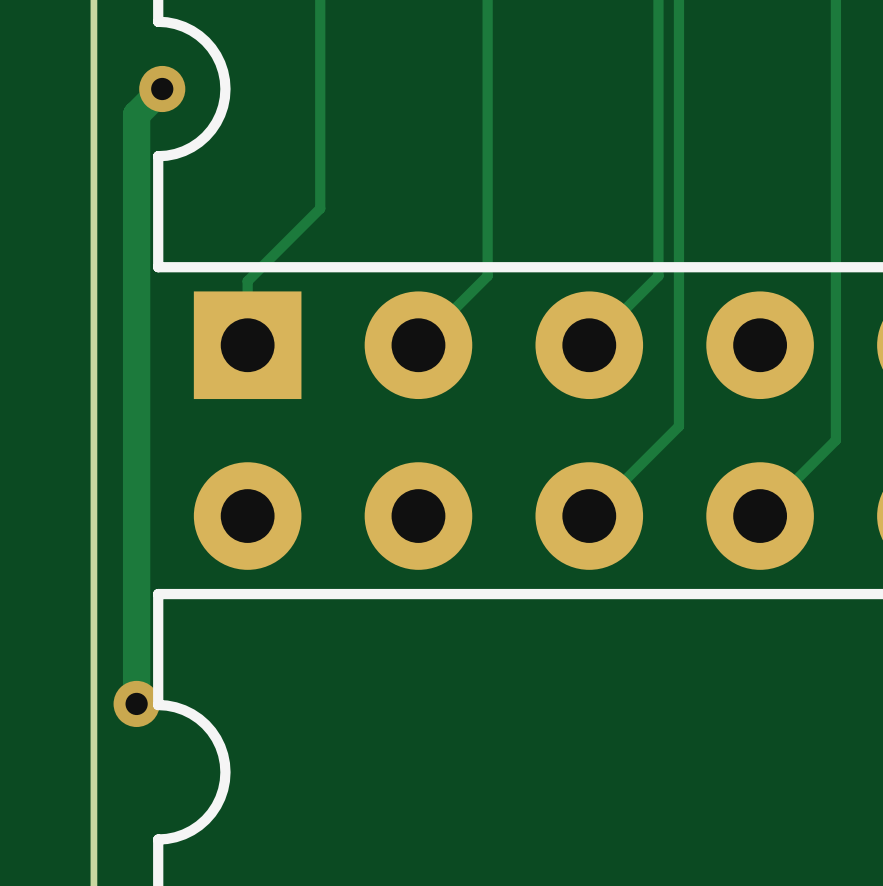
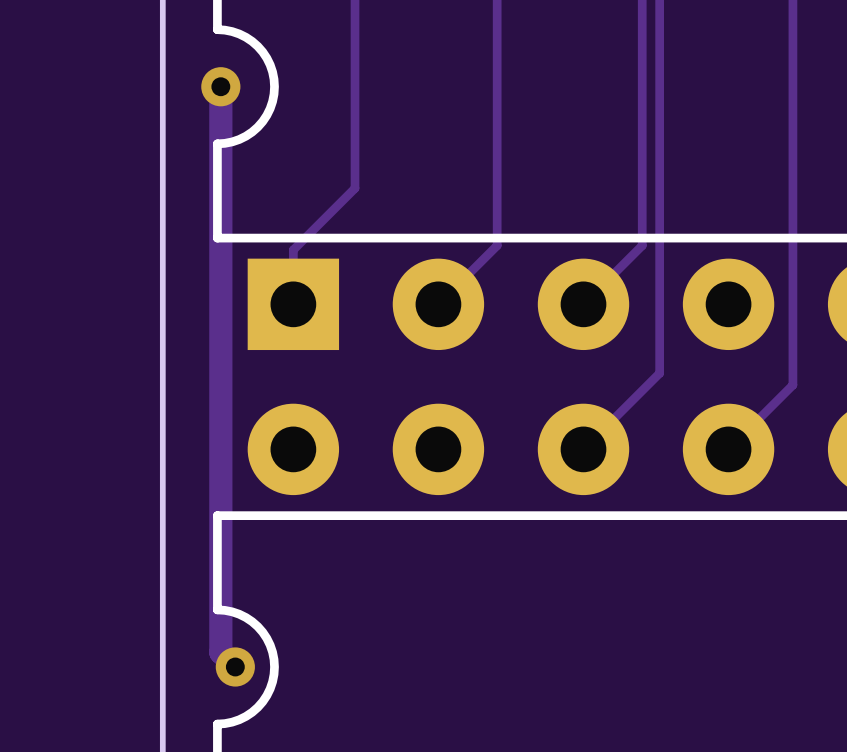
track: (162, 89) (136, 114) (136, 703) -> (220, 86) (220, 652) (235, 666)
via position: (136, 703) -> (235, 666)

